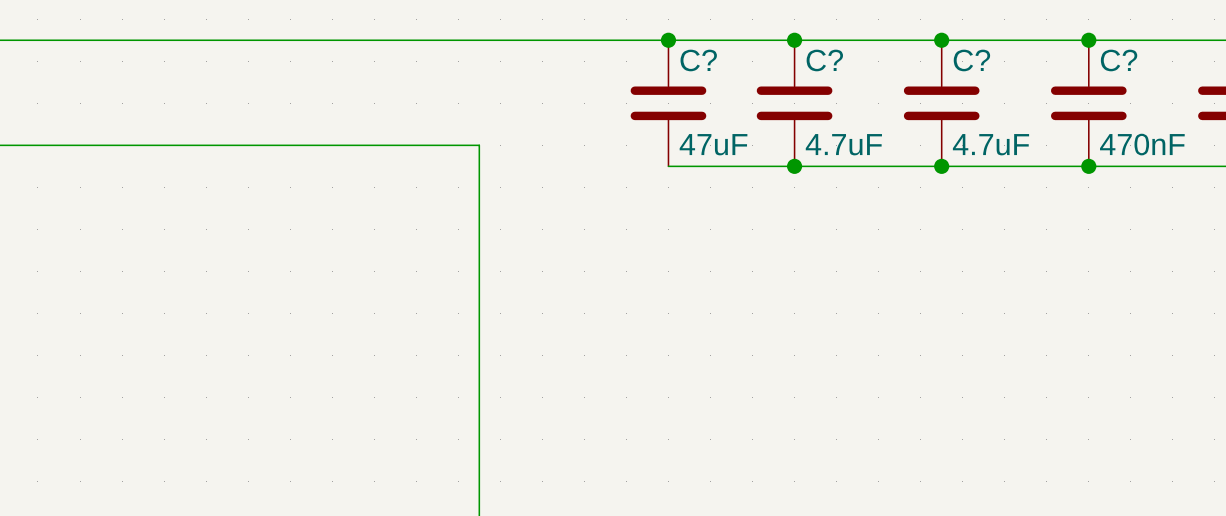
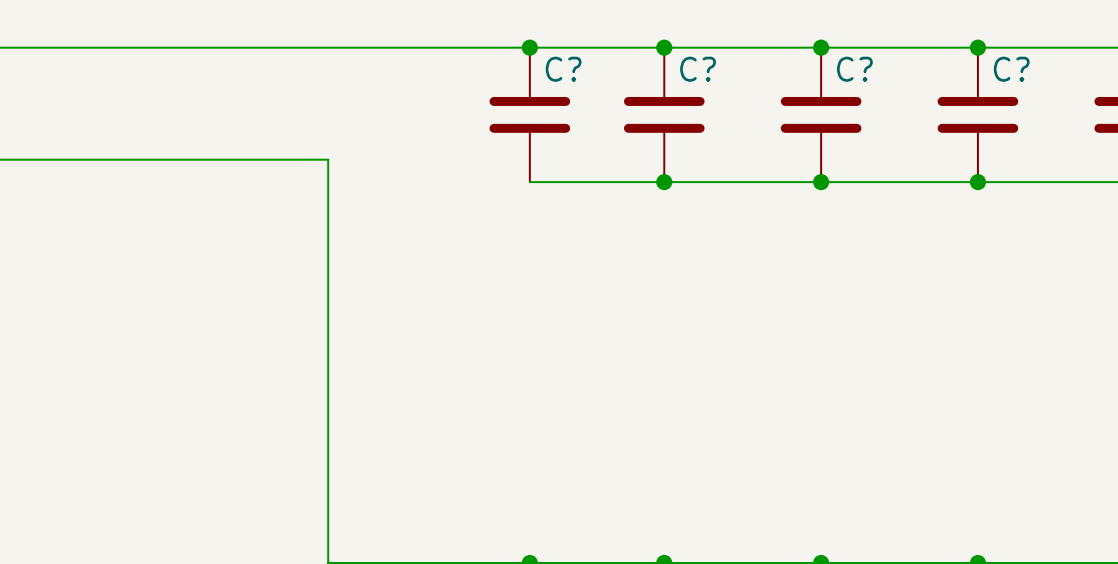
C? value: 47uF (713, 144) -> none
C? value: 4.7uF (843, 144) -> none
C? value: 4.7uF (990, 144) -> none
C? value: 470nF (1142, 144) -> none

